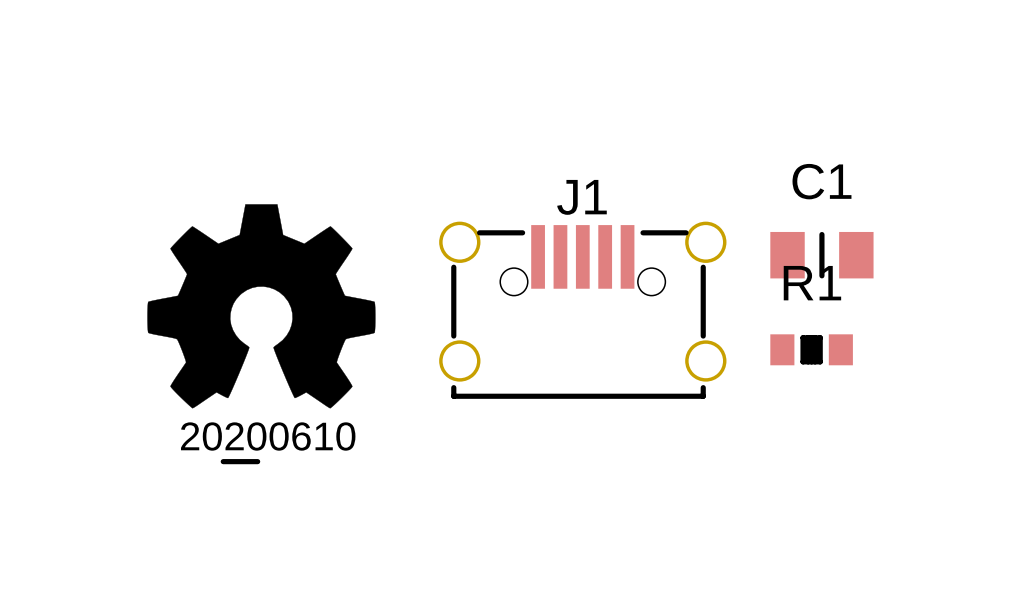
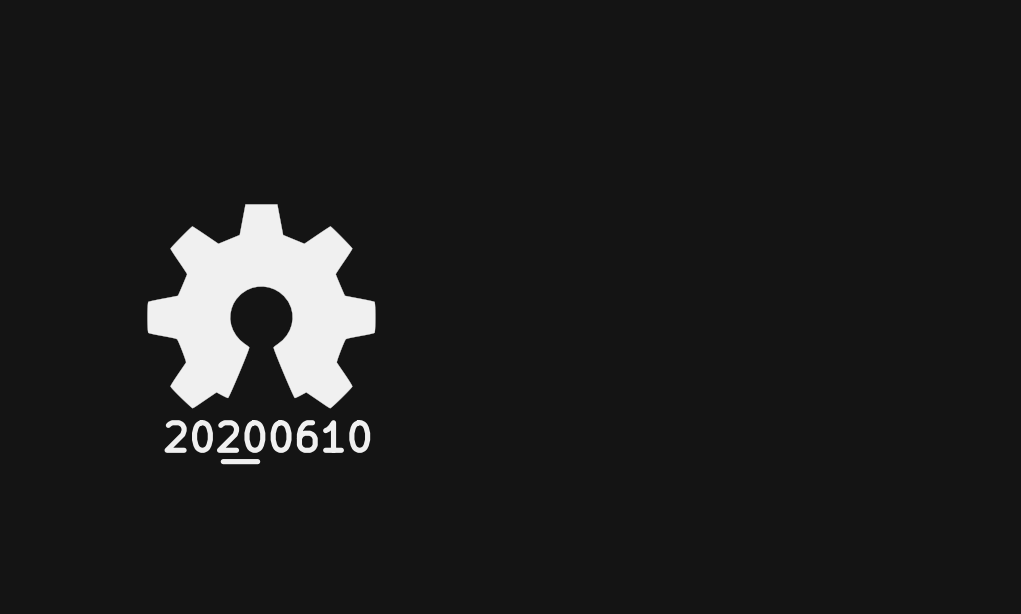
C1: (821, 255) -> none
J1: (582, 310) -> none
R1: (811, 349) -> none

